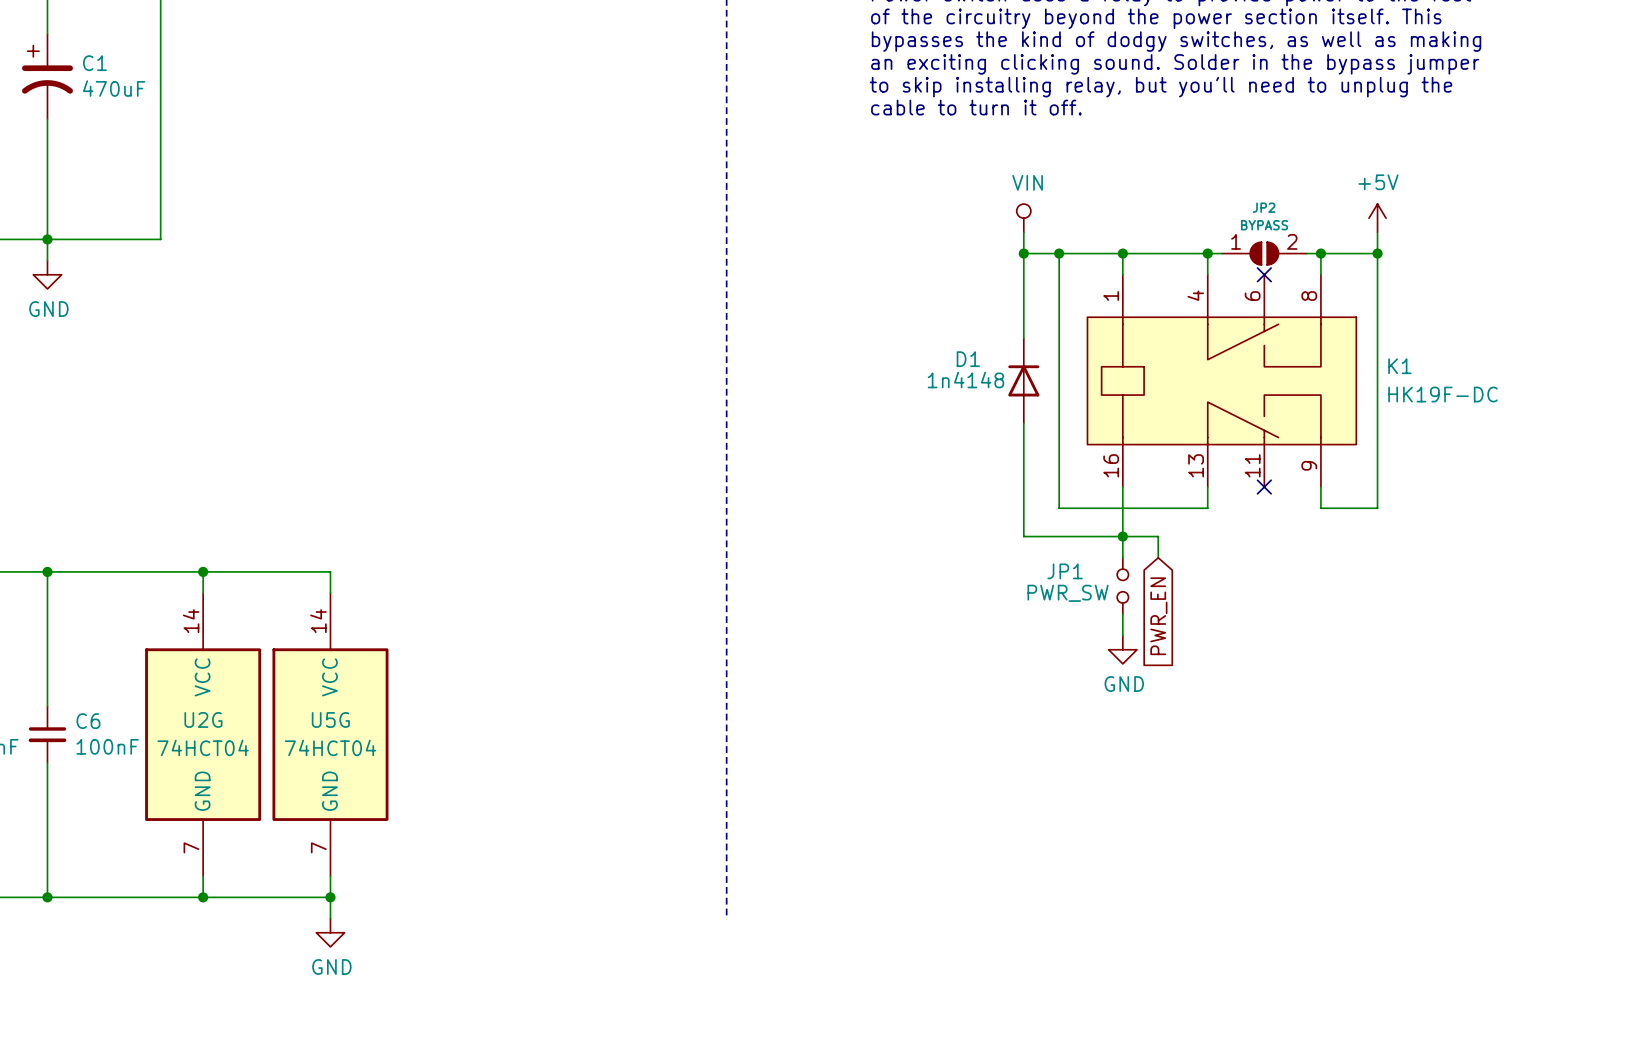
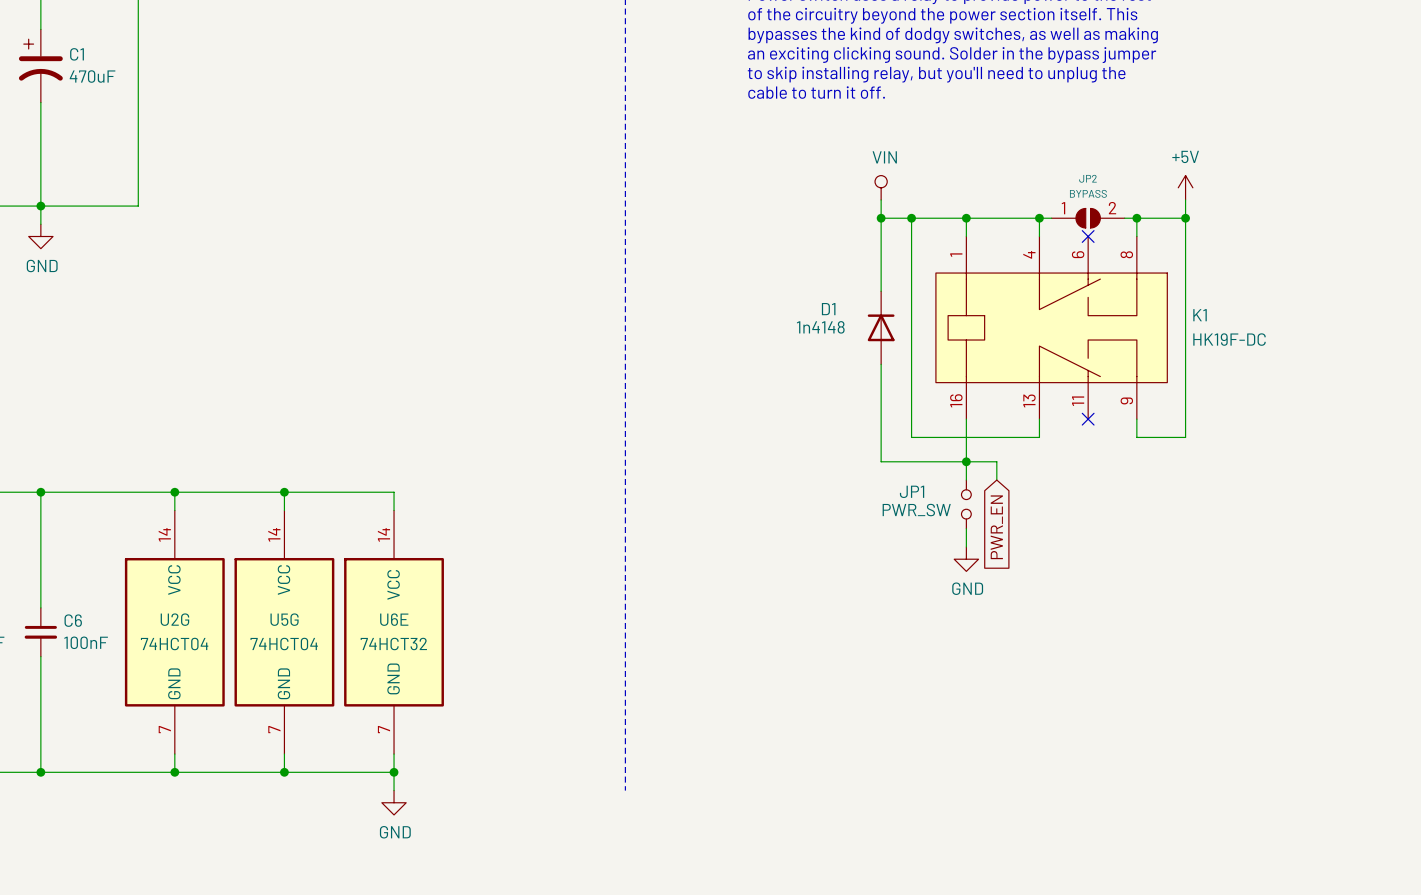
wire: none -> (284, 492) (394, 492) (394, 510)
junction: none -> (284, 492)
U6E: none -> 74HCT32 (394, 632)
wire: none -> (394, 754) (394, 790)
wire: (330, 897) (330, 918) -> (284, 772) (394, 772)
junction: none -> (394, 772)
power symbol position: GND (330, 932) -> GND (394, 802)

